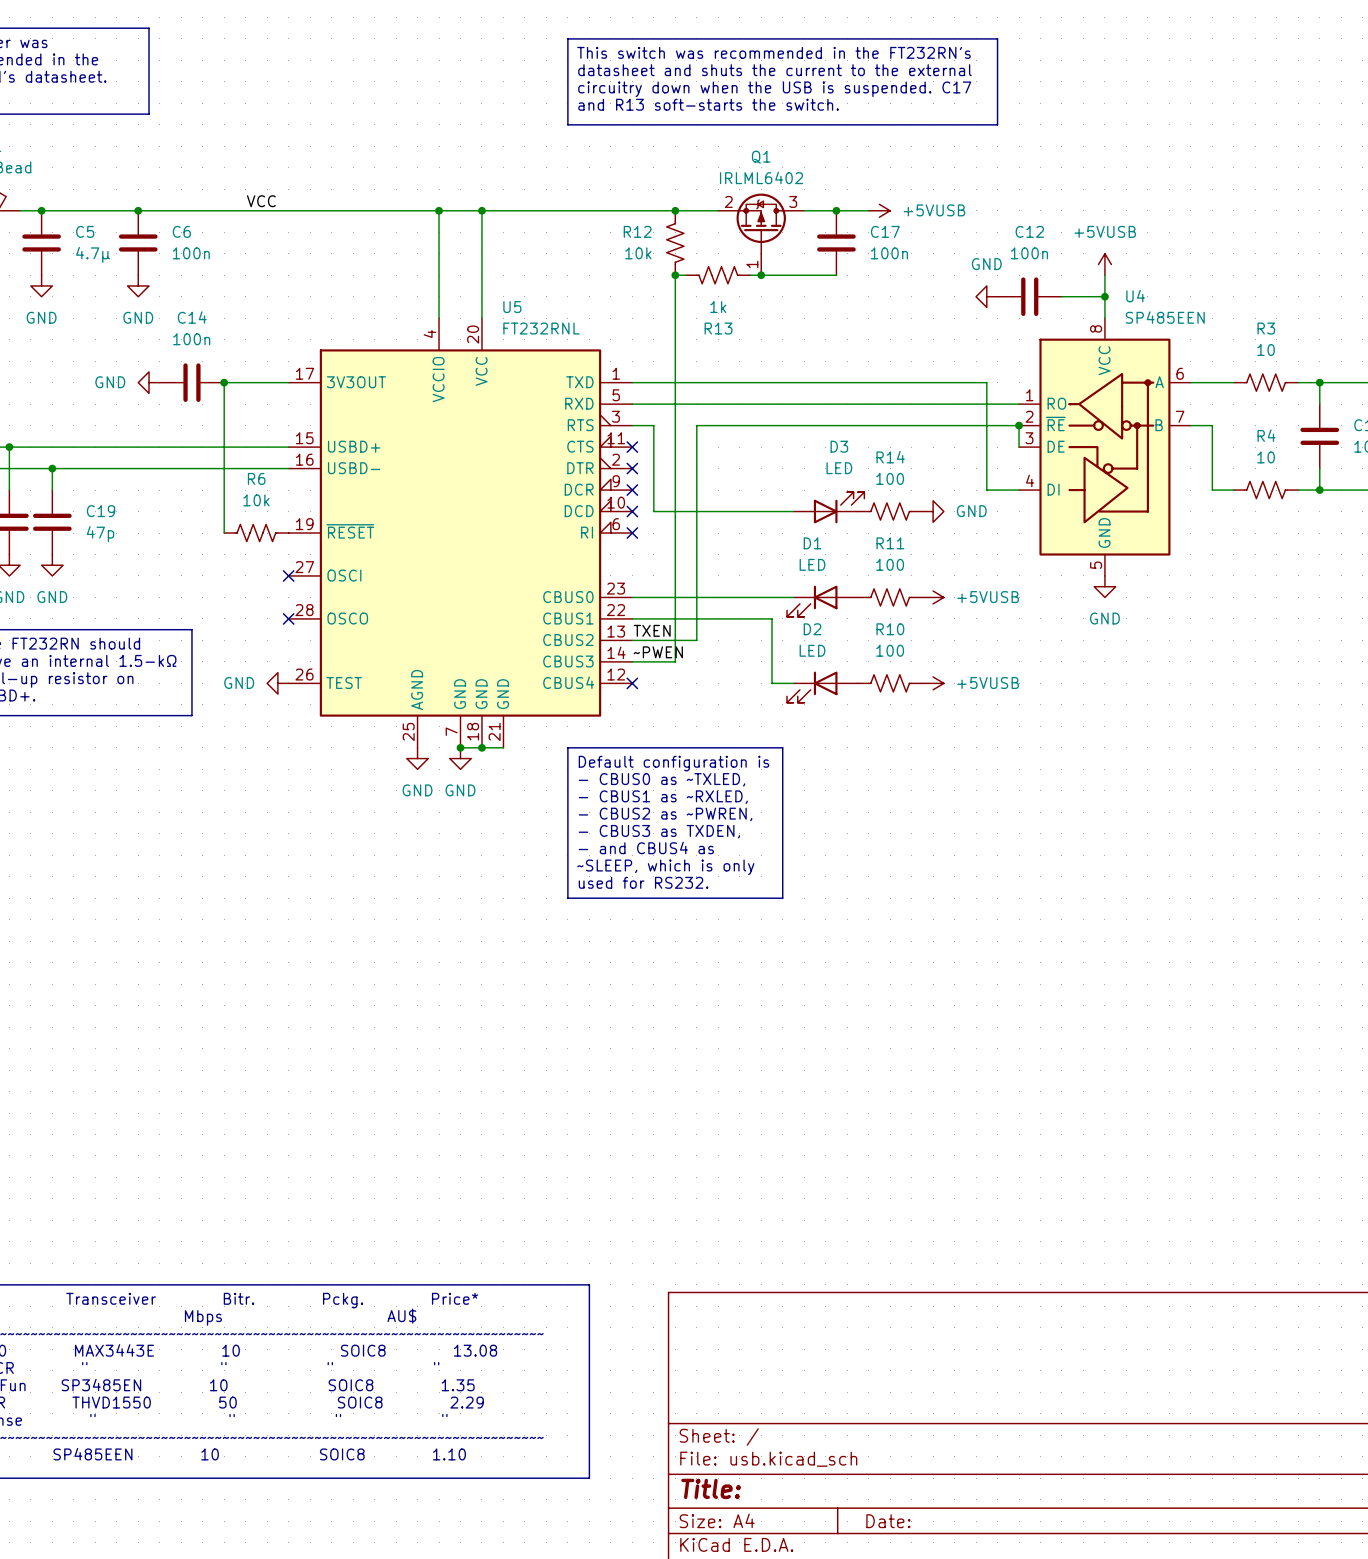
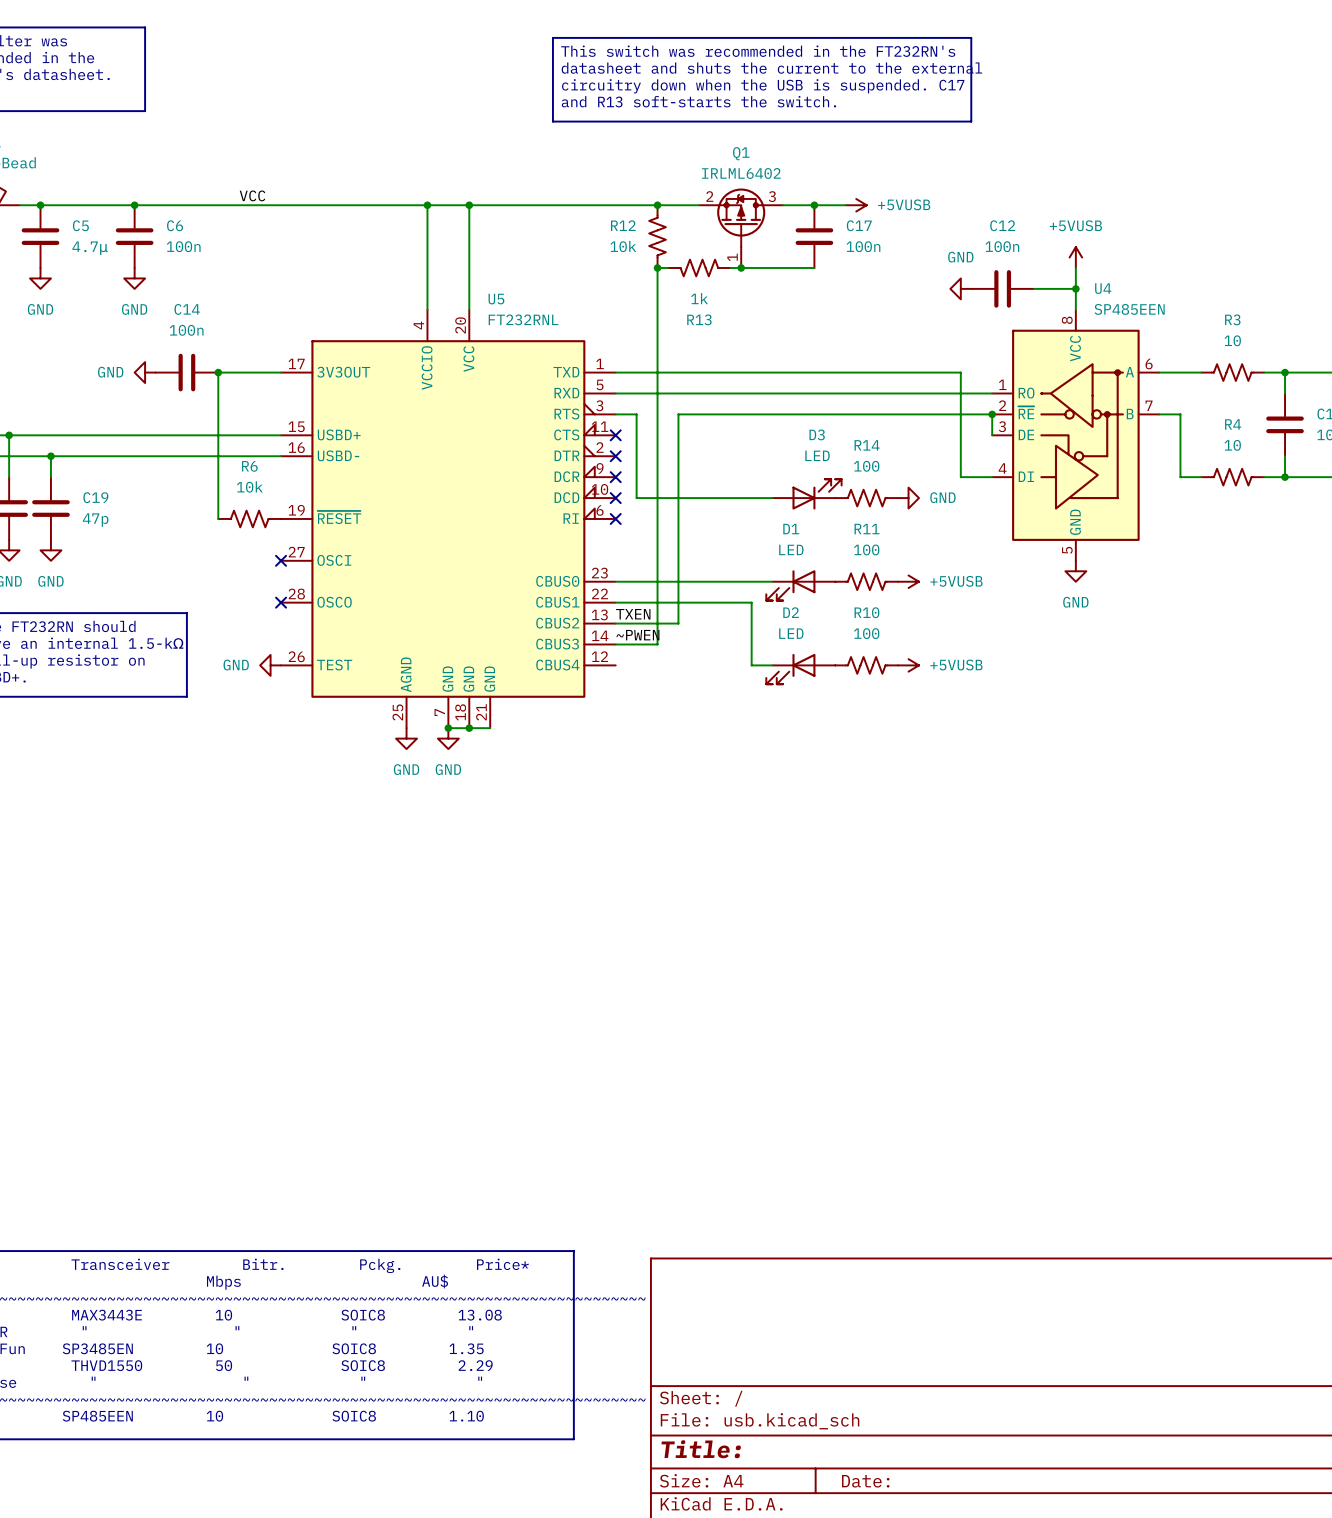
no-connect mark: (632, 683) -> none
line: (567, 747) (782, 747) (782, 898) (567, 898) (567, 747) -> none
text: Default configuration is (673, 763) -> none
text: - CBUS0 as ~TXLED, (661, 779) -> none
text: - CBUS1 as ~RXLED, (663, 797) -> none
text: - CBUS2 as ~PWREN, (665, 814) -> none
text: - CBUS3 as TXDEN, (659, 831) -> none
text: - and CBUS4 as (646, 847) -> none
text: ~SLEEP, which is only (665, 867) -> none
text: used for RS232. (643, 882) -> none

